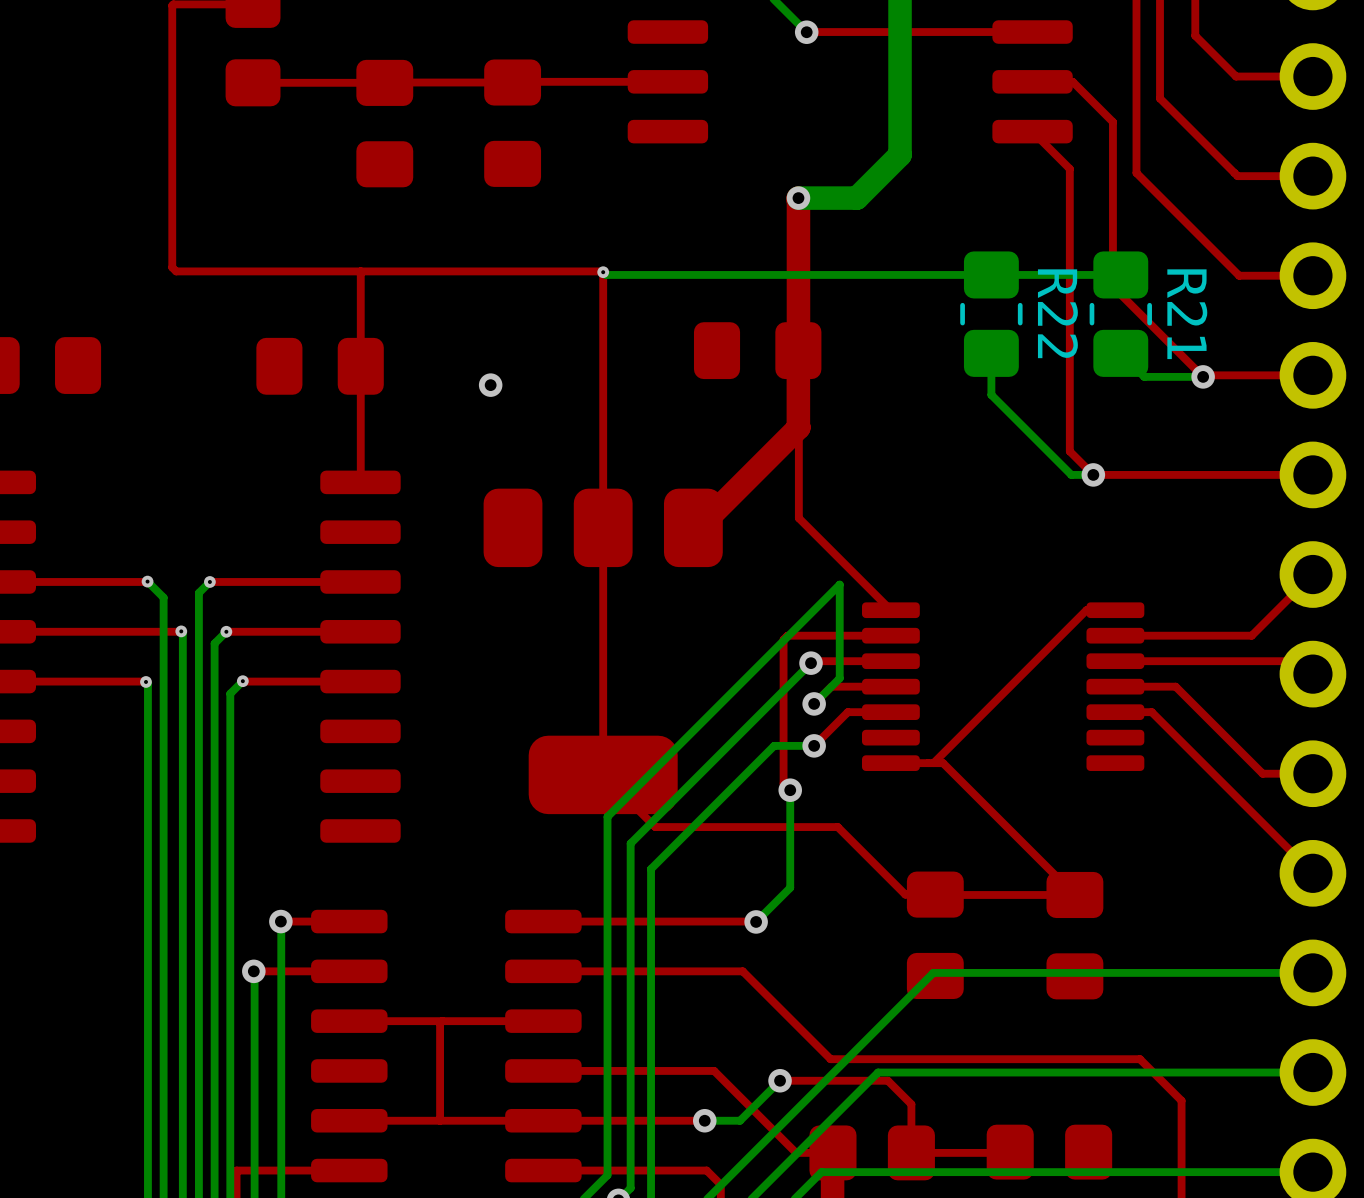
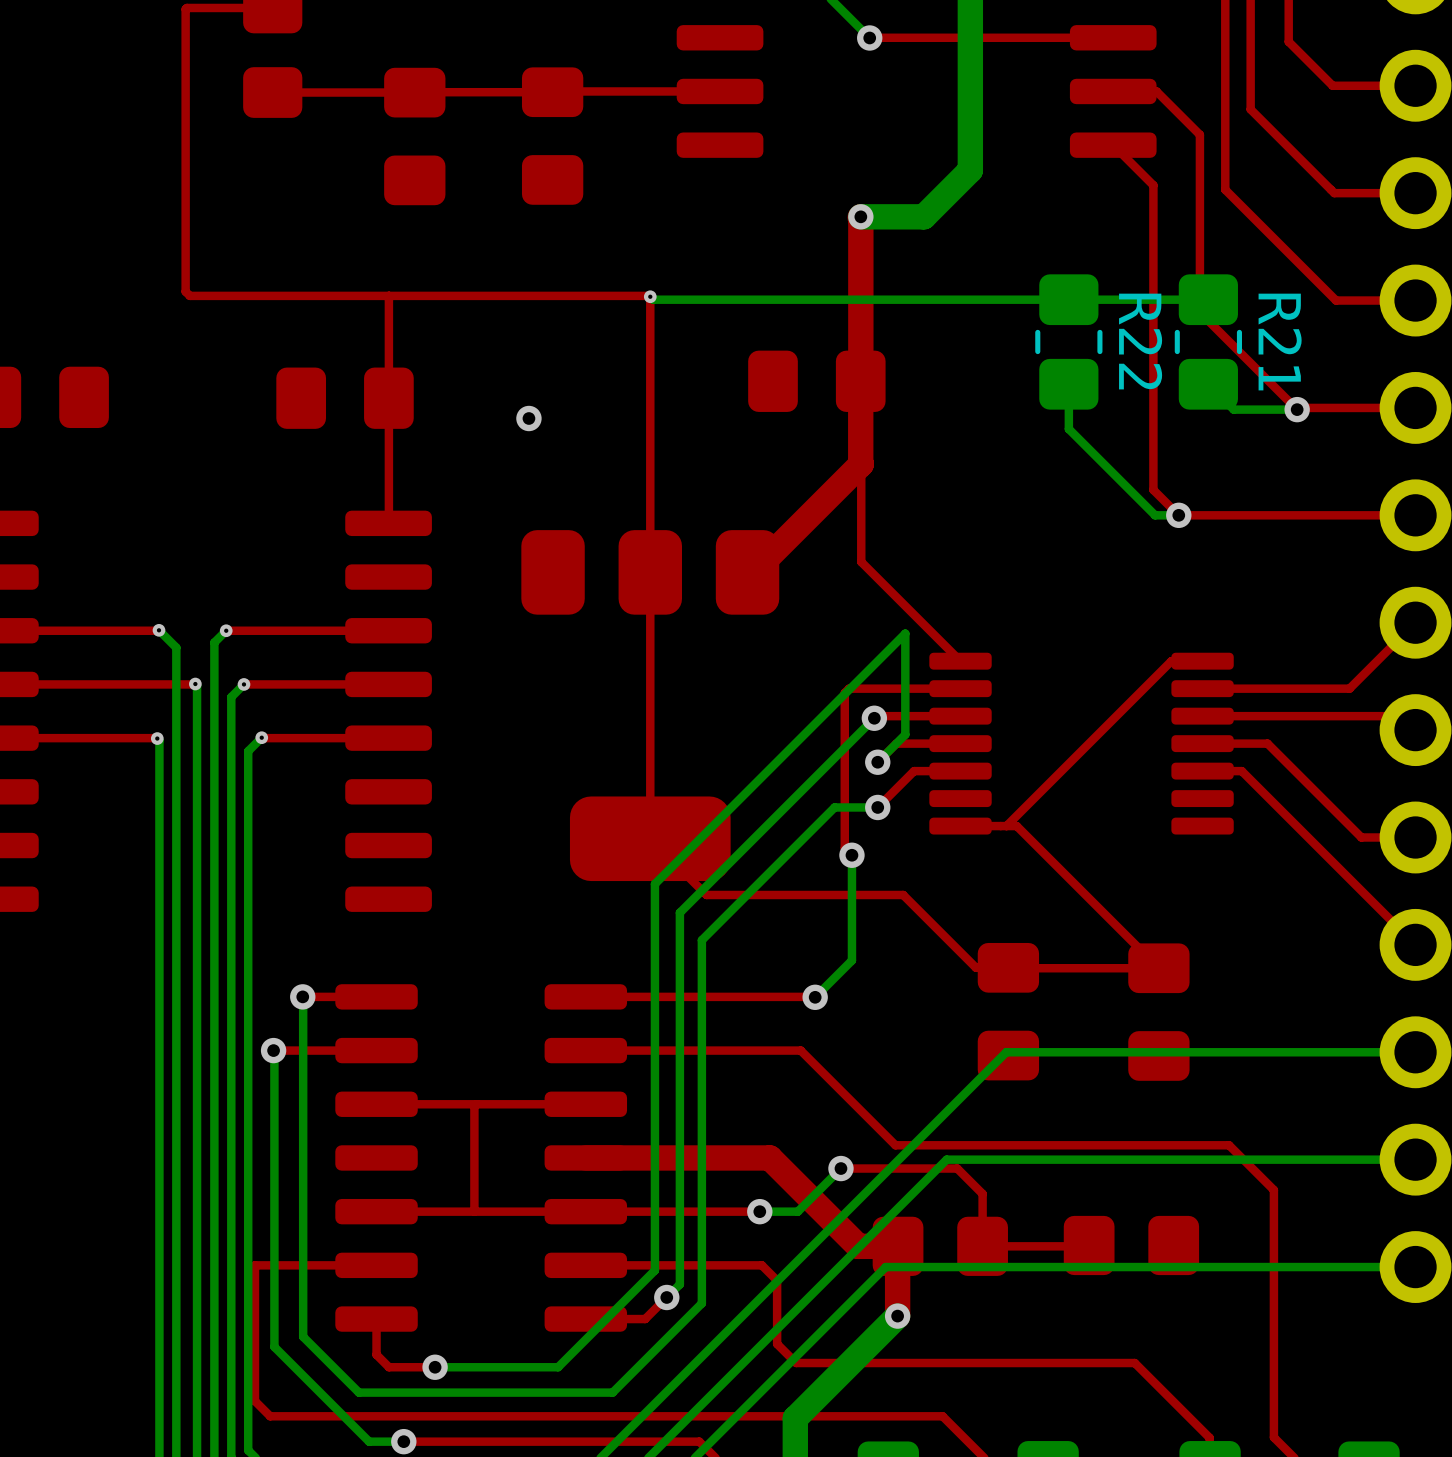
top track width: thin (543, 1070) (714, 1070) (796, 1152) (832, 1152) -> thick (585, 1157) (769, 1157) (858, 1246) (898, 1246)

